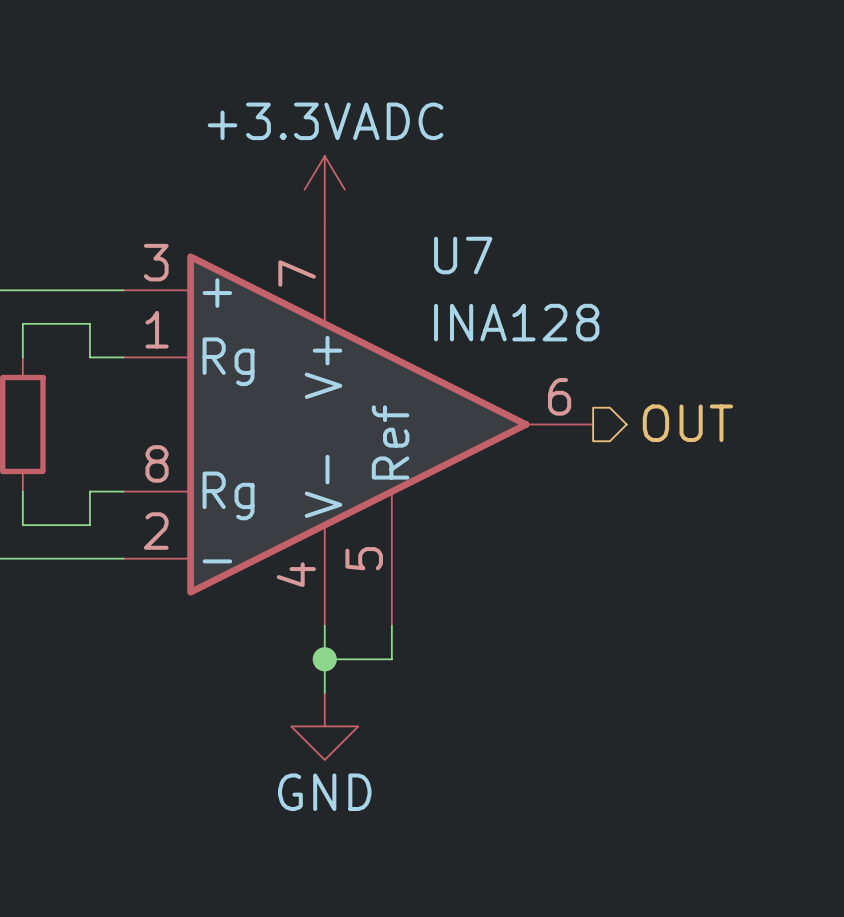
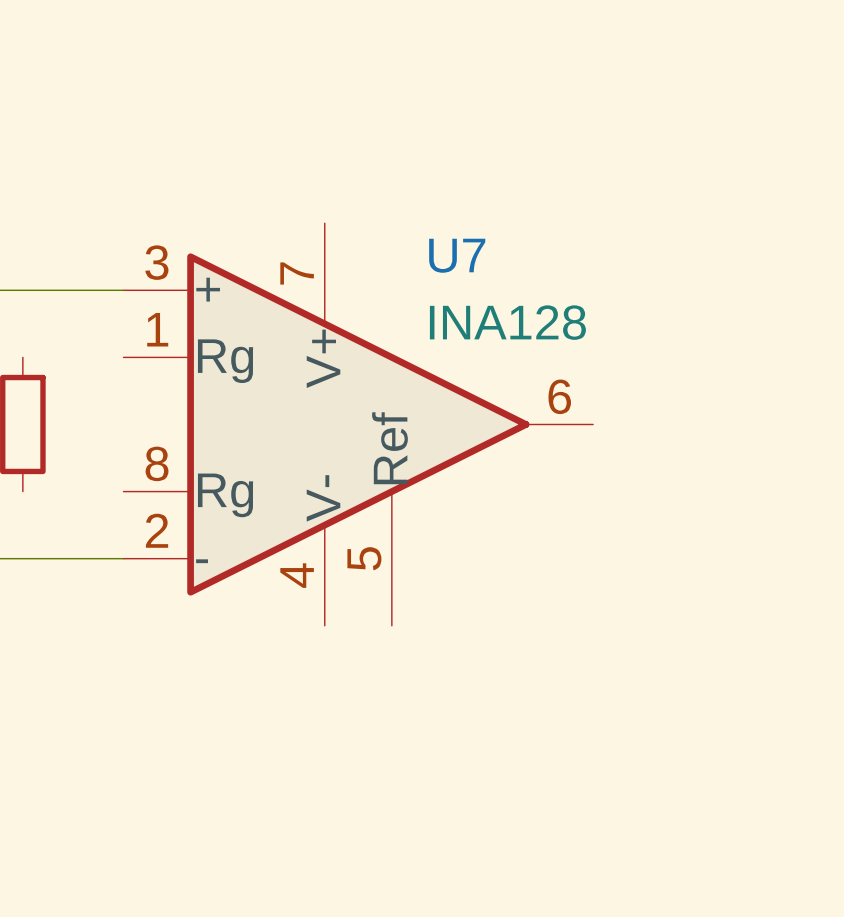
power symbol: +3.3VADC (324, 189) -> none
wire: (22, 357) (22, 323) (89, 323) (89, 357) (123, 357) -> none
hierarchical label: OUT (687, 423) -> none
wire: (22, 491) (22, 525) (89, 525) (89, 491) (123, 491) -> none
wire: (324, 625) (324, 692) -> none
wire: (391, 625) (391, 659) (324, 659) -> none
junction: (324, 659) -> none
power symbol: GND (324, 726) -> none

